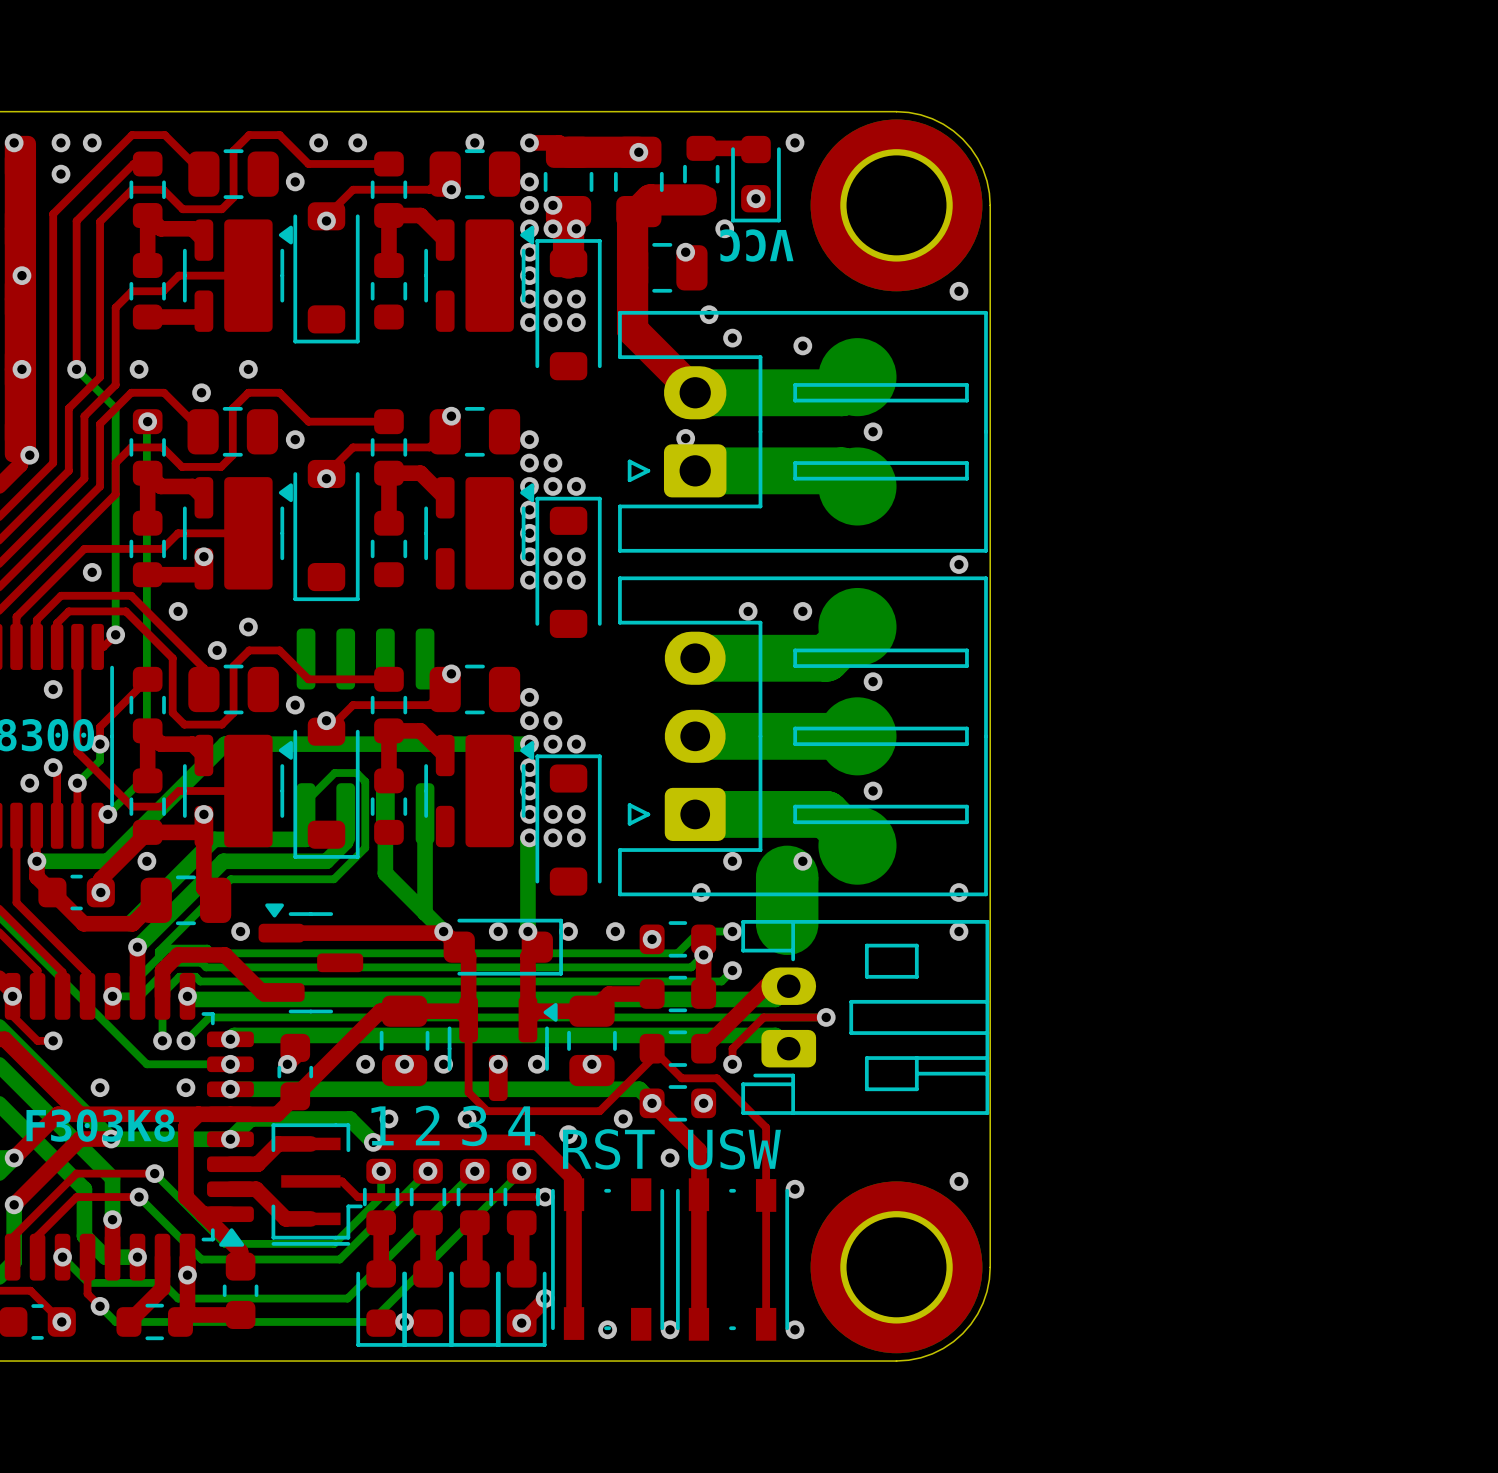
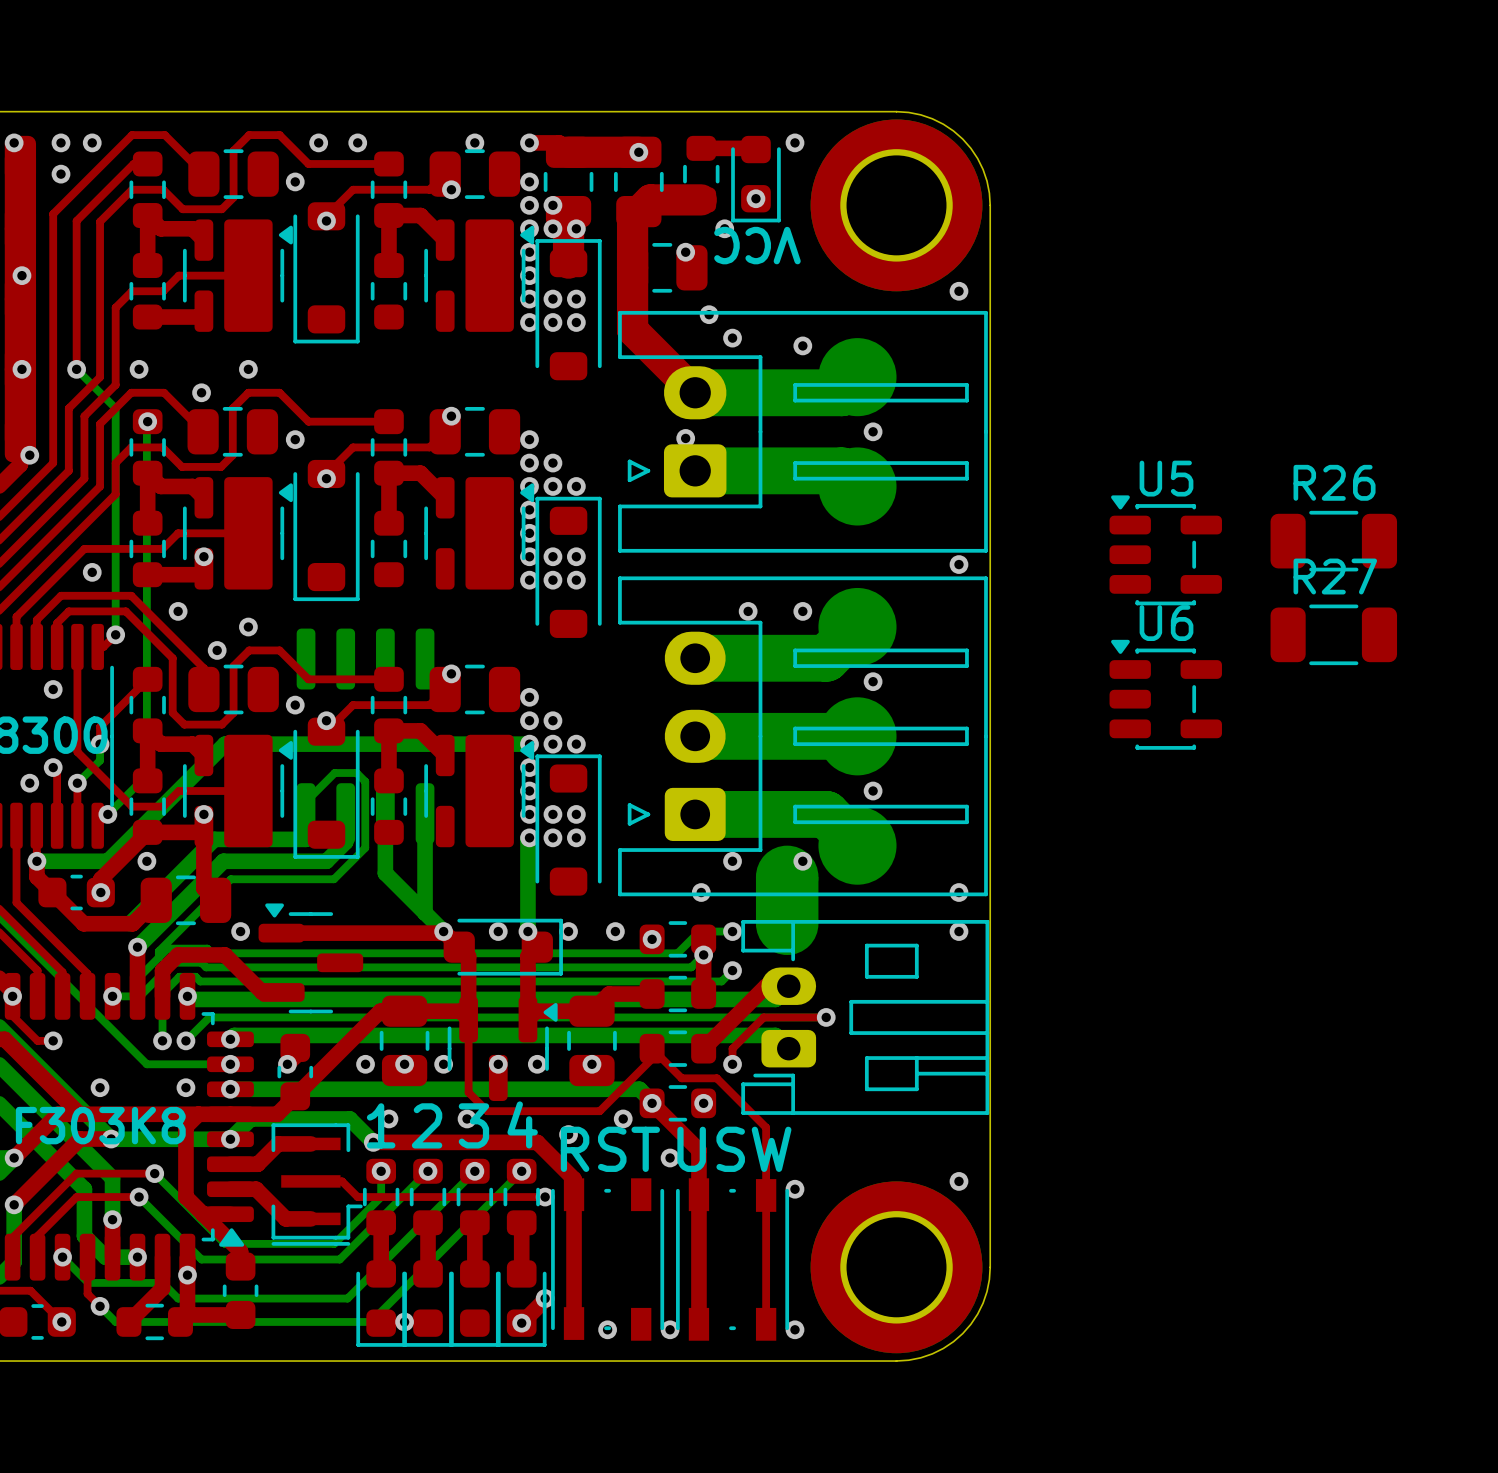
R26: none -> (1333, 541)
U5: none -> (1165, 550)
R27: none -> (1333, 634)
U6: none -> (1165, 694)

